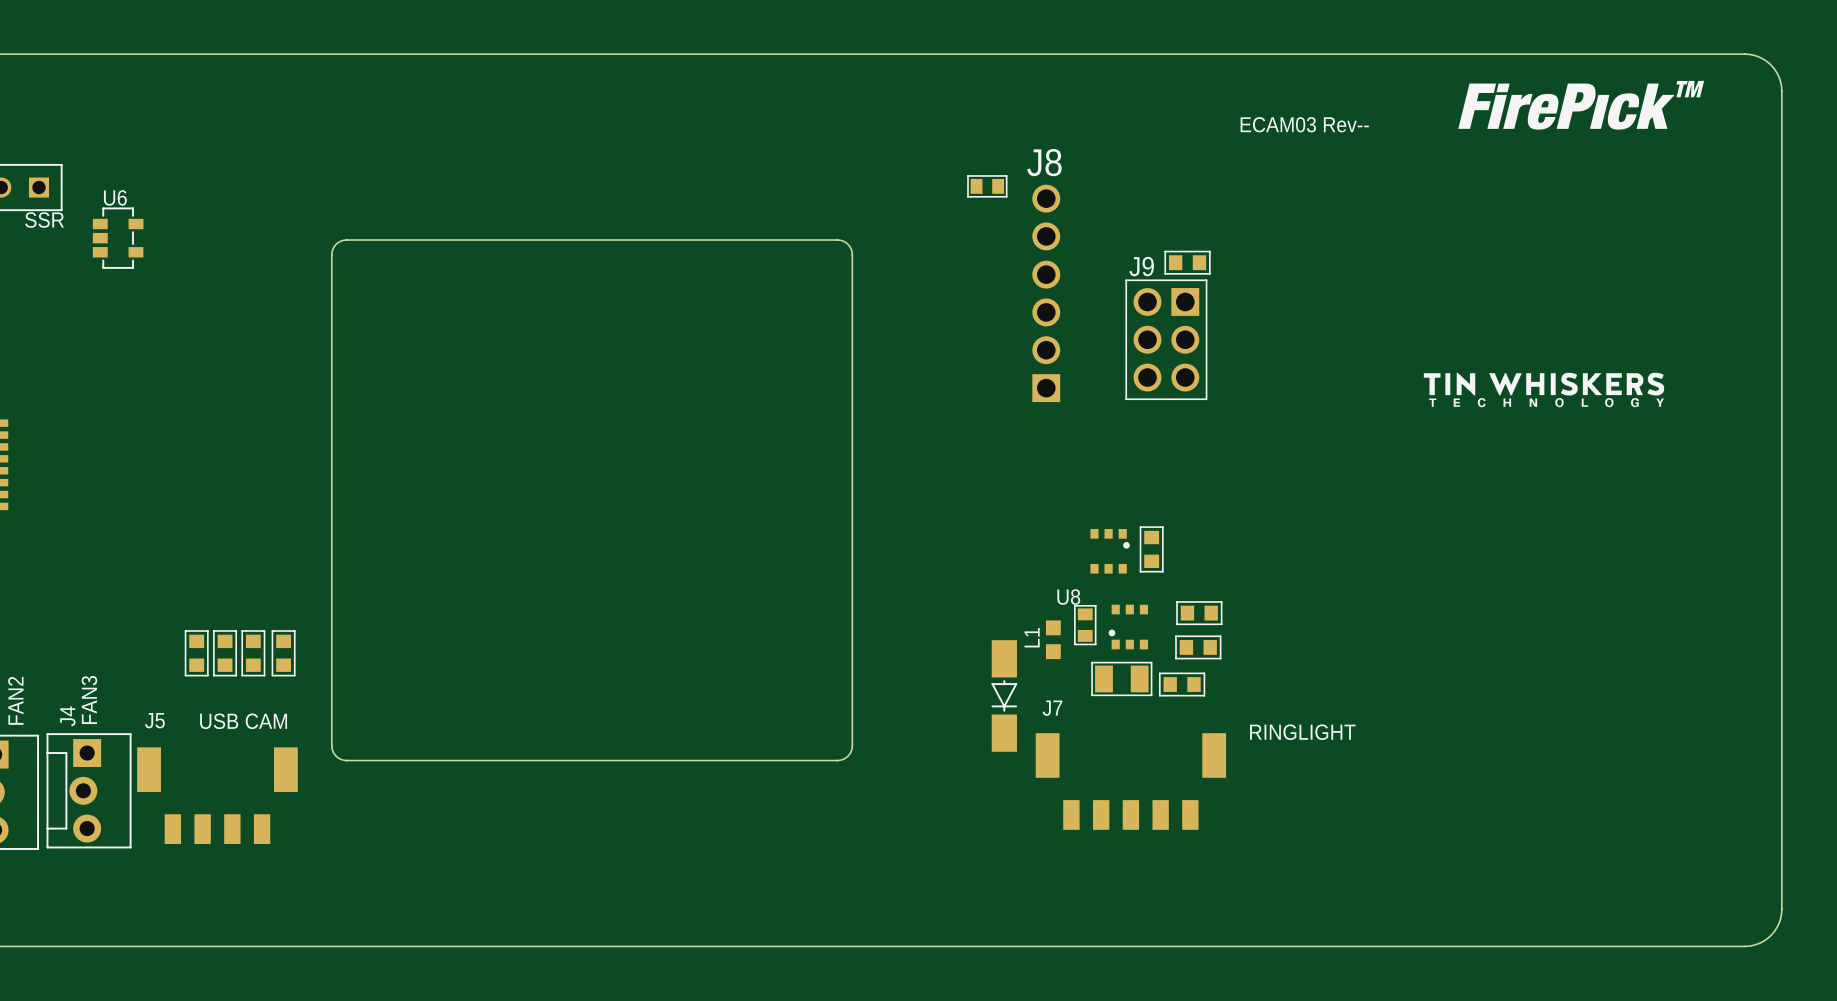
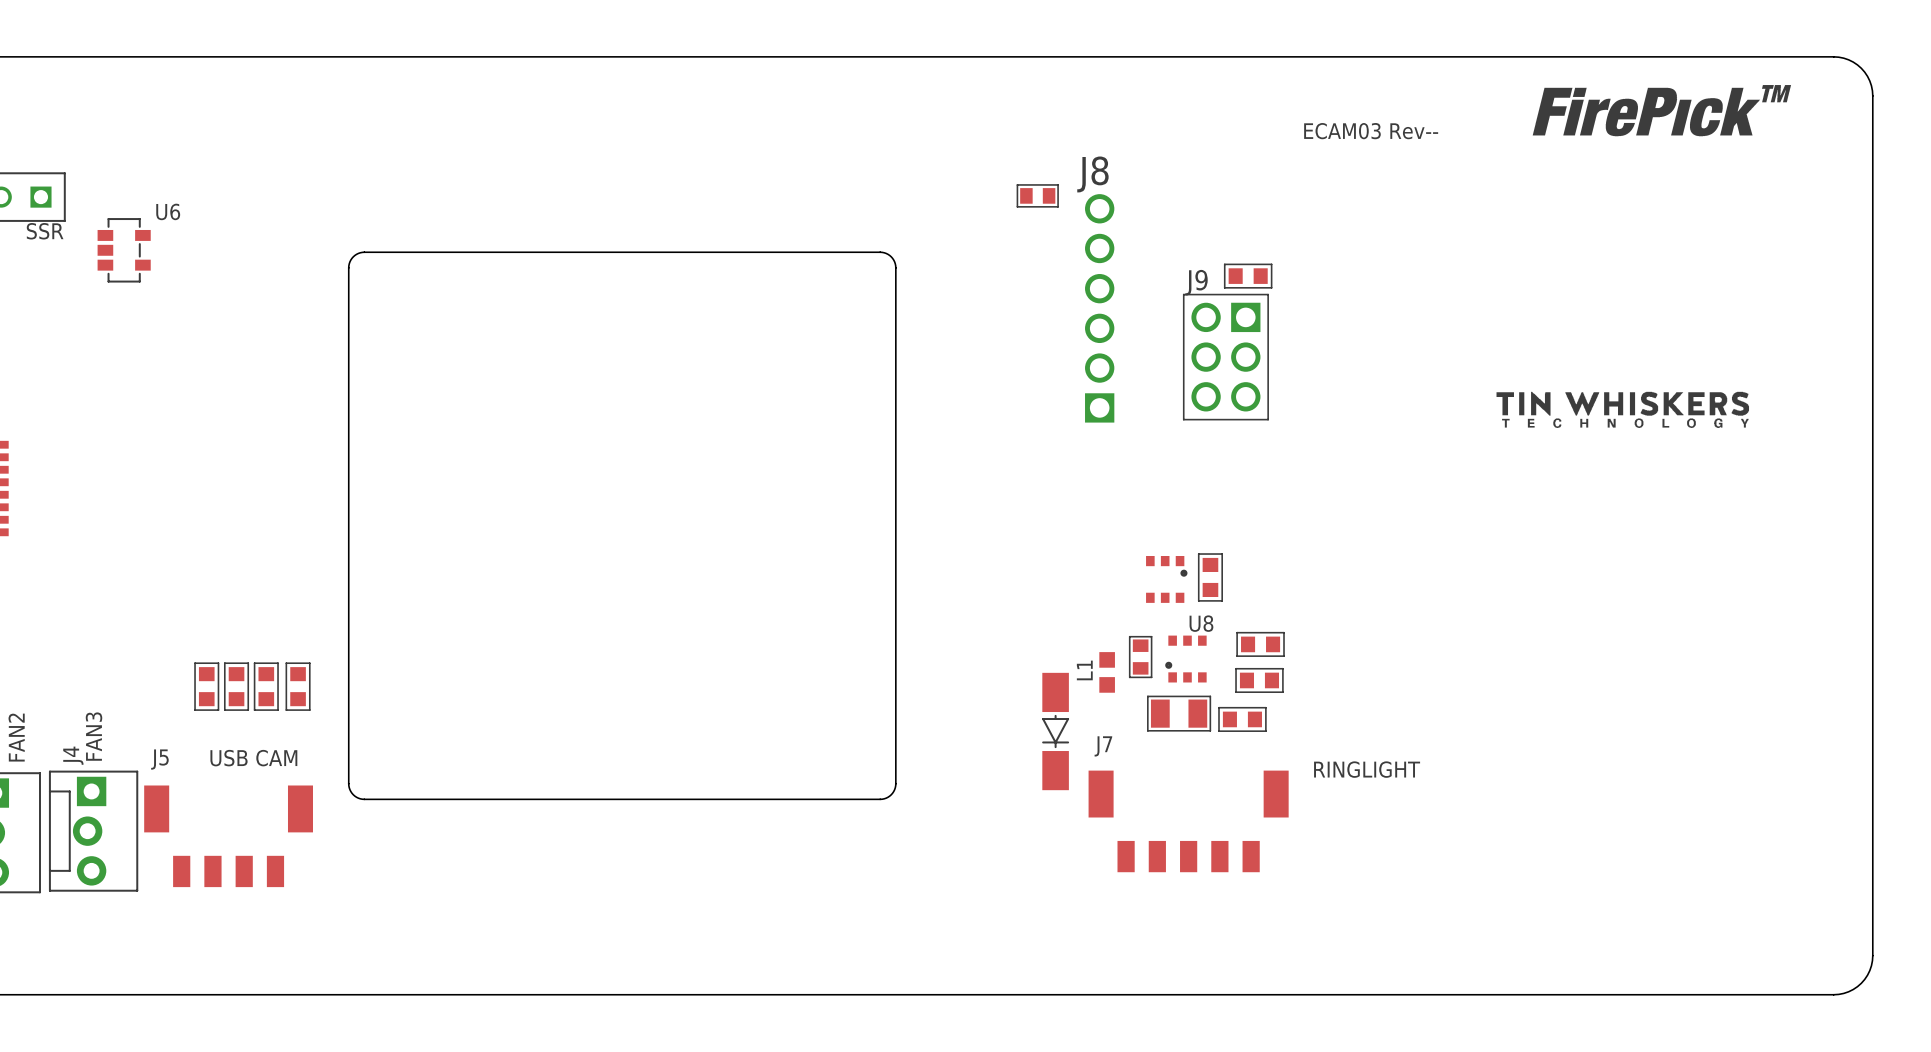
U6 name position: U6 (115, 197) -> U6 (168, 211)
U8 name position: U8 (1068, 597) -> U8 (1201, 623)

